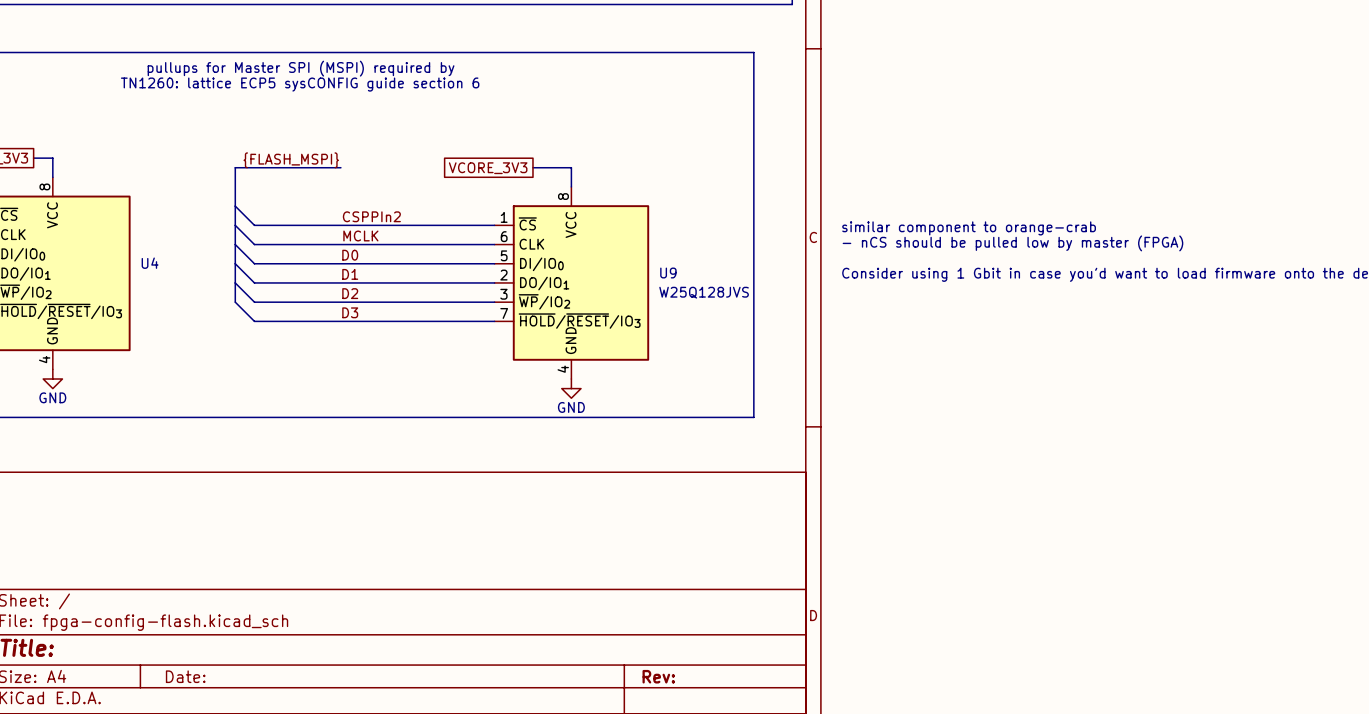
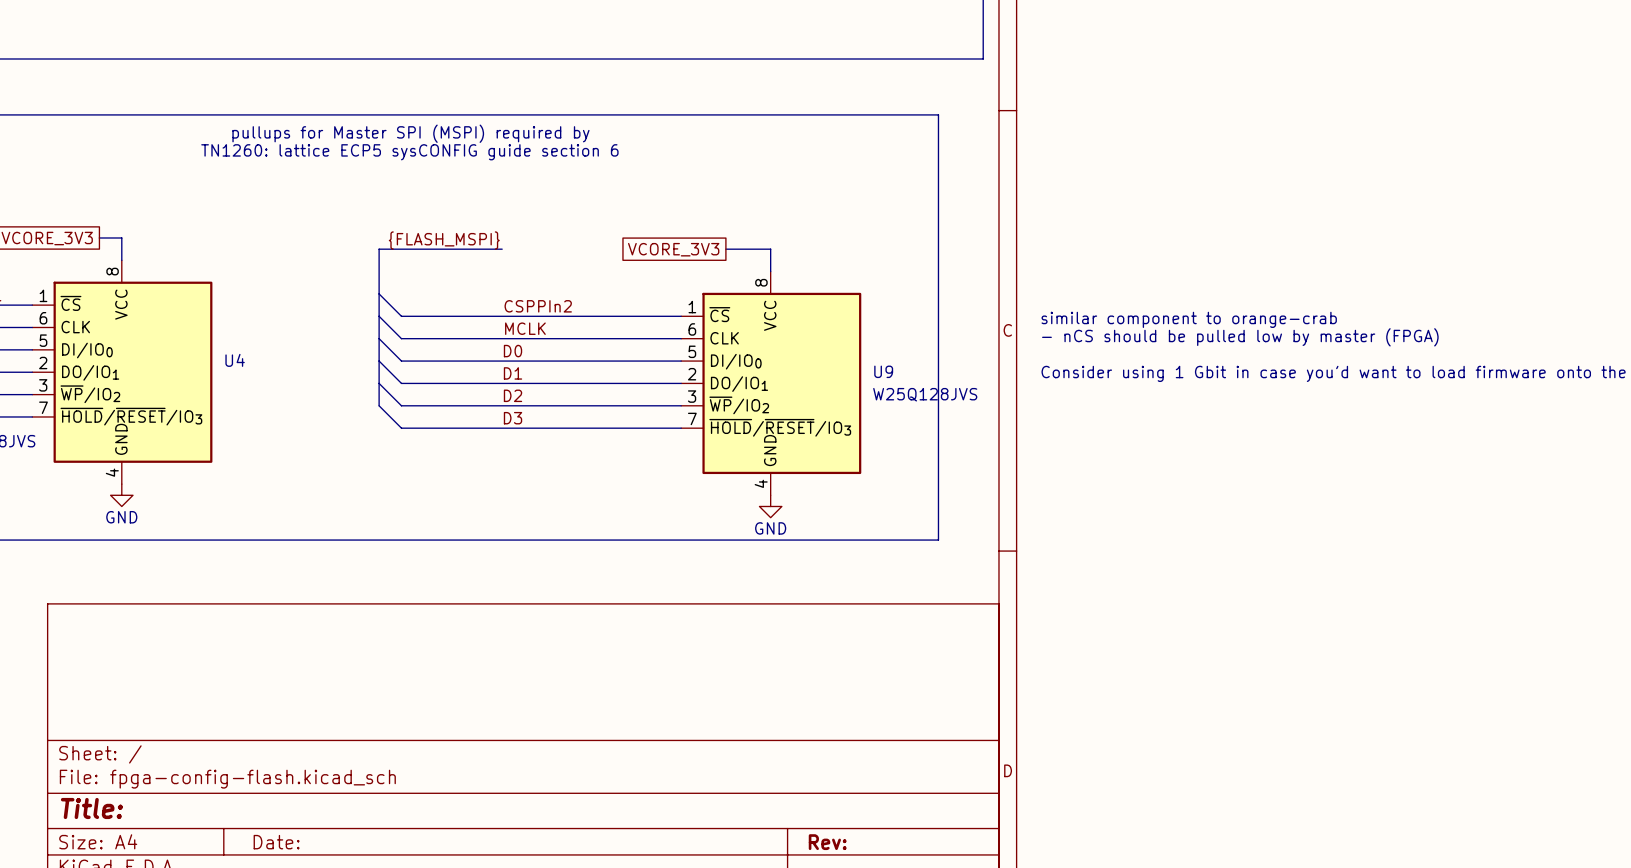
label position: {FLASH_MSPI} (291, 160) -> {FLASH_MSPI} (444, 240)
bus: (273, 167) (235, 167) (235, 302) -> (379, 249) (379, 405)
bus: none -> (457, 249) (502, 249)
wire: (532, 167) (571, 167) (571, 186) -> (725, 249) (770, 249) (770, 271)
global label position: VCORE_3V3 (488, 168) -> VCORE_3V3 (673, 249)
wire: (235, 206) (254, 225) (292, 225) -> (379, 293) (401, 316)
label position: CSPPIn2 (371, 216) -> CSPPIn2 (538, 306)
wire: (235, 225) (254, 244) (292, 244) -> (379, 316) (401, 338)
label position: MCLK (360, 235) -> MCLK (525, 328)
wire: (235, 244) (254, 263) (292, 263) -> (379, 338) (401, 361)
label position: D0 (350, 255) -> D0 (513, 351)
wire: (235, 263) (254, 282) (292, 282) -> (379, 361) (401, 383)
label position: D1 (350, 274) -> D1 (513, 373)
wire: (235, 282) (254, 302) (292, 302) -> (379, 383) (401, 405)
U9 position: (571, 282) -> (771, 383)
label position: D2 (350, 293) -> D2 (513, 395)
wire: (235, 302) (254, 321) (292, 321) -> (379, 405) (401, 428)
label position: D3 (350, 312) -> D3 (513, 418)
power symbol position: GND (571, 388) -> GND (770, 506)

